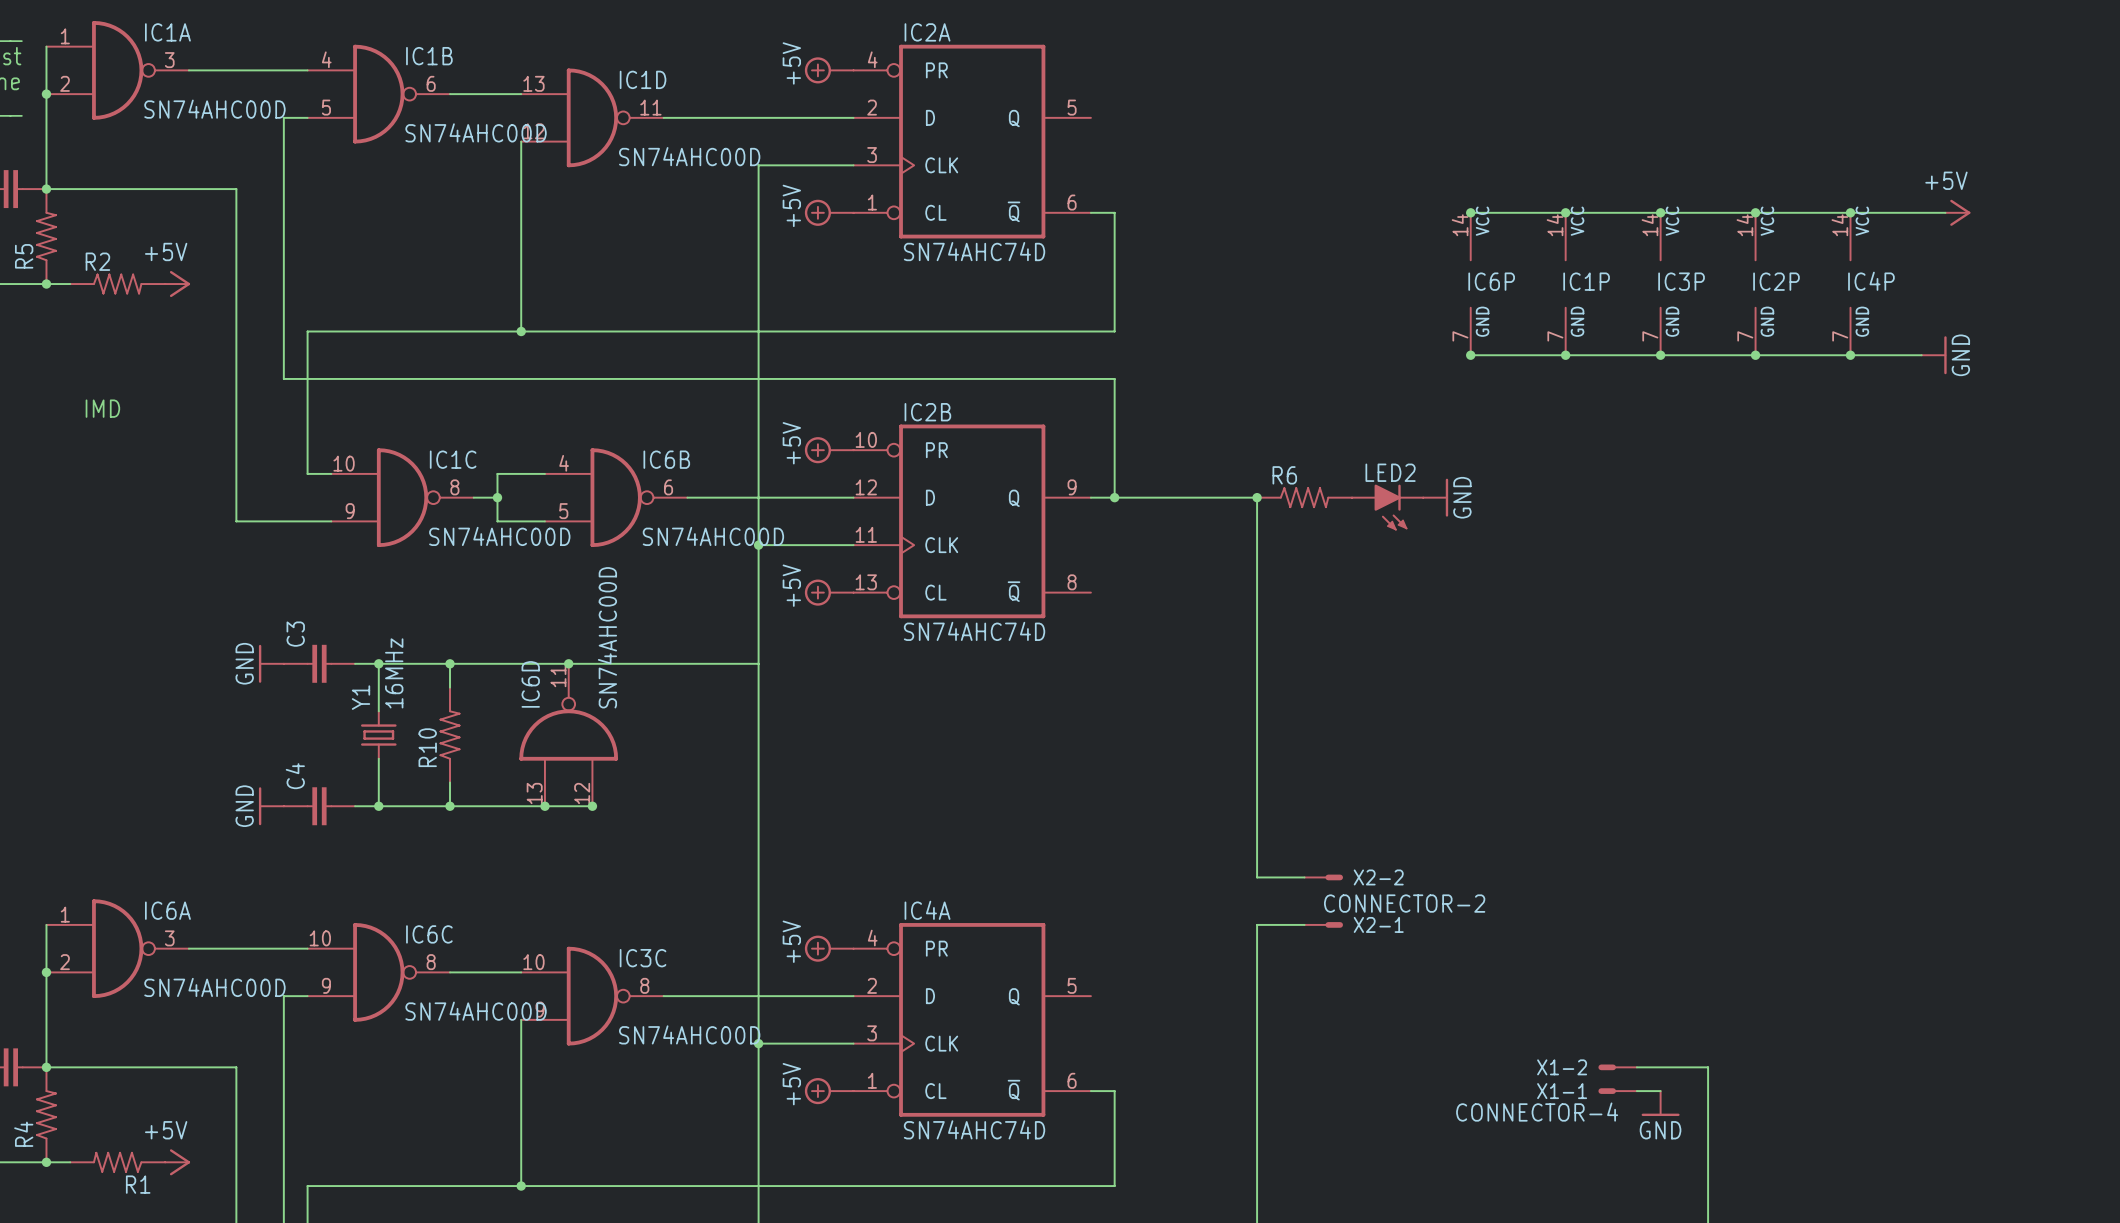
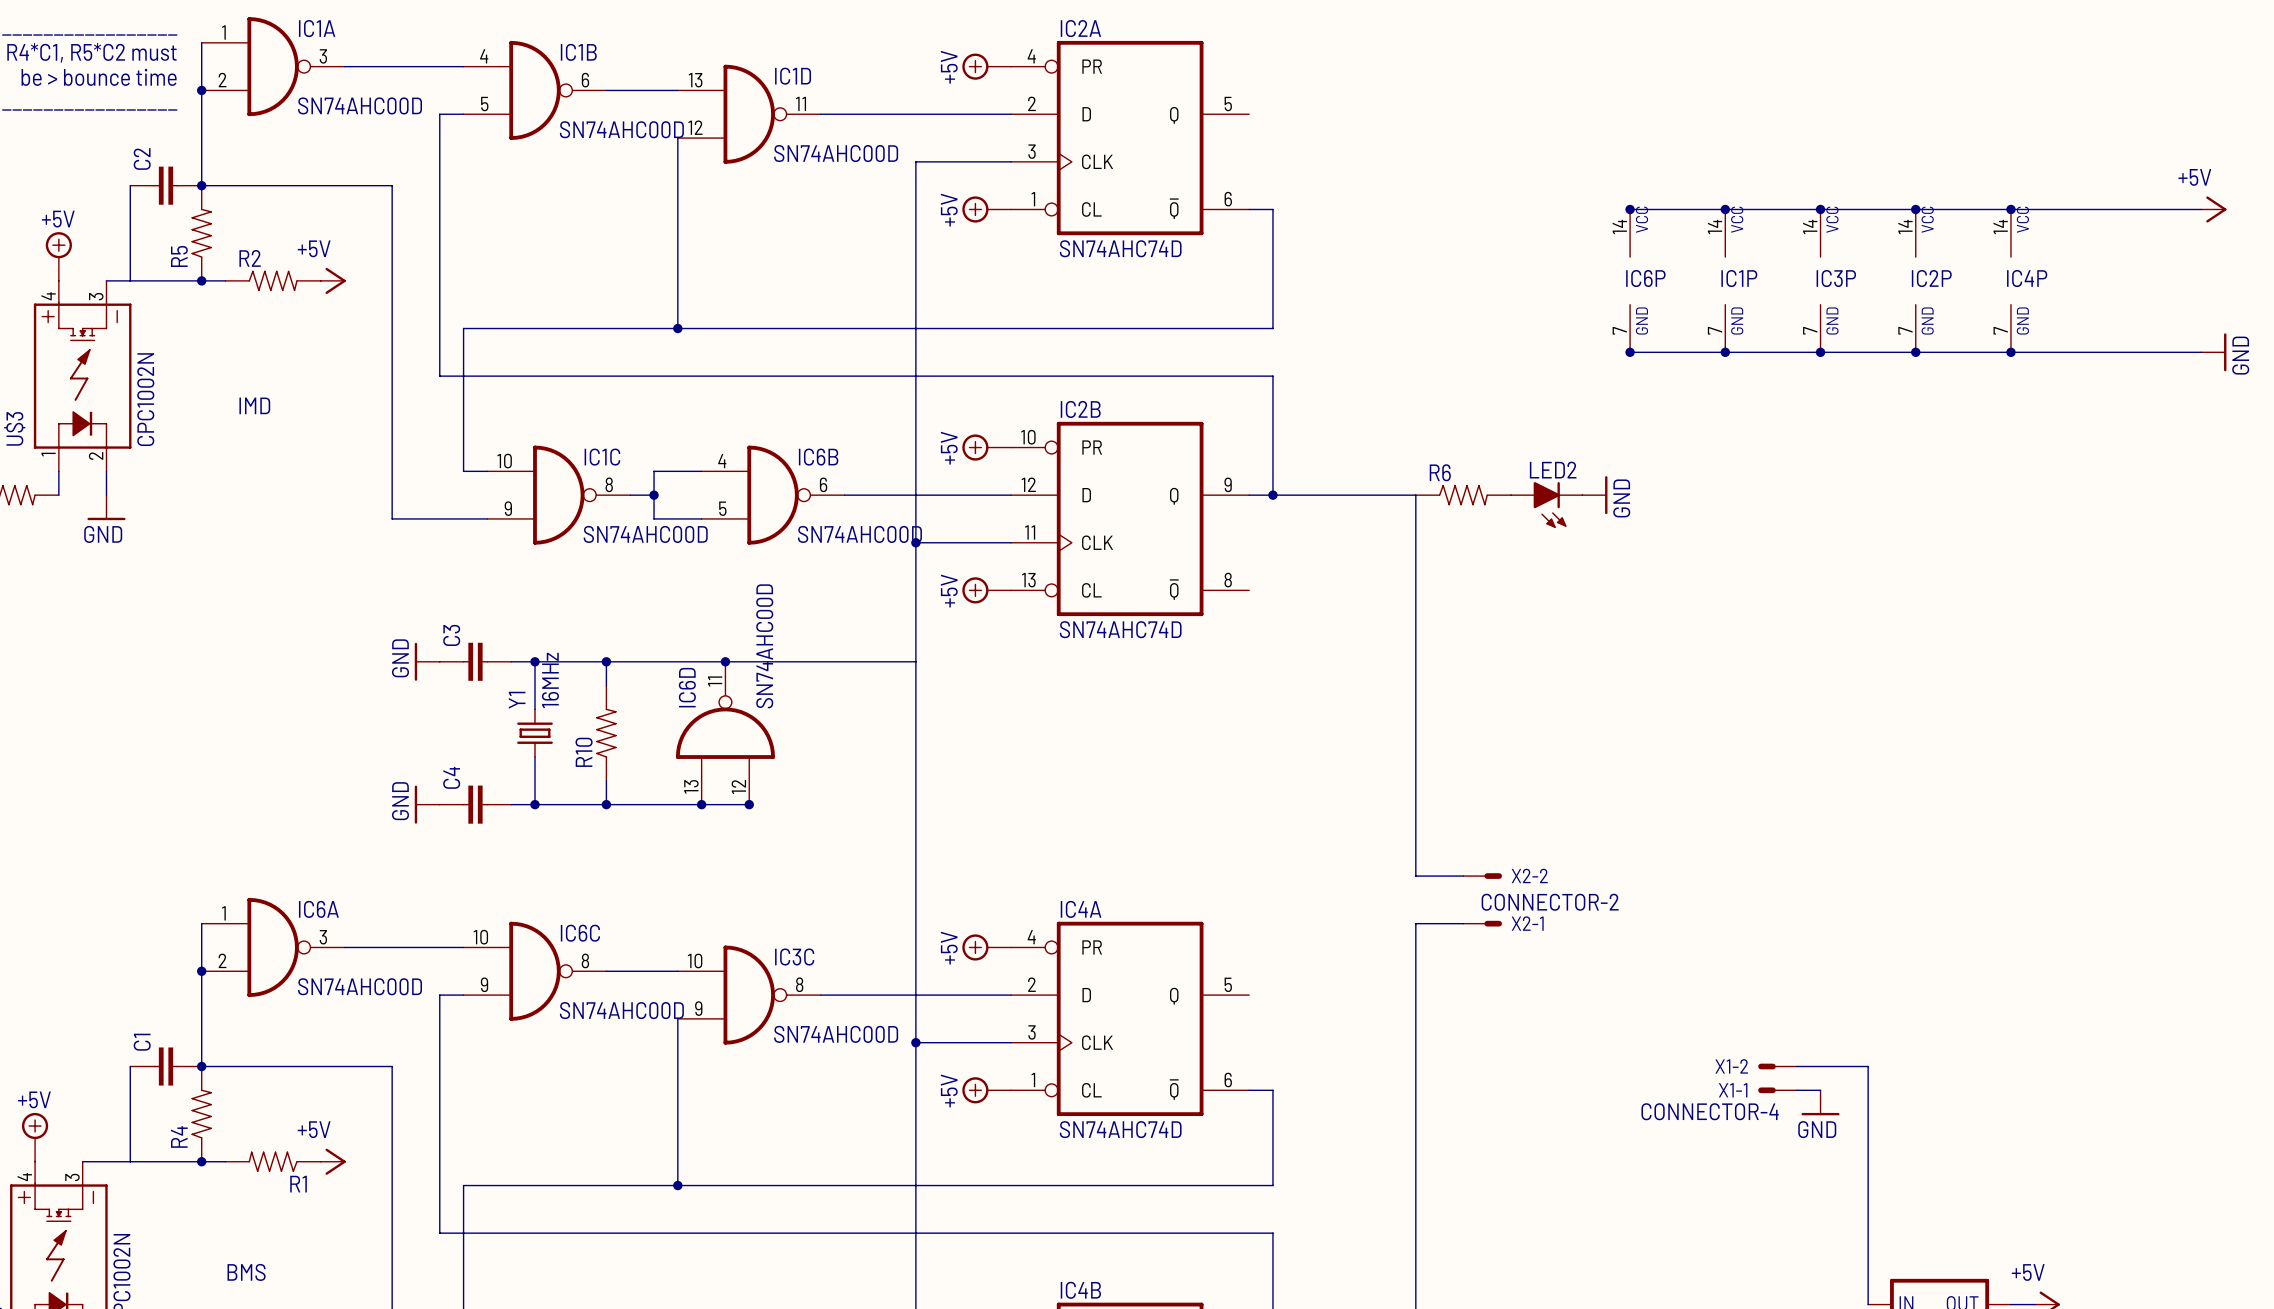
wire: none -> (2106, 209) (2201, 209)
power symbol position: +5V (1957, 212) -> +5V (2213, 209)
wire: none -> (2082, 352) (2201, 352)
power symbol position: GND (1934, 355) -> GND (2213, 352)
junction: (1257, 497) -> none

